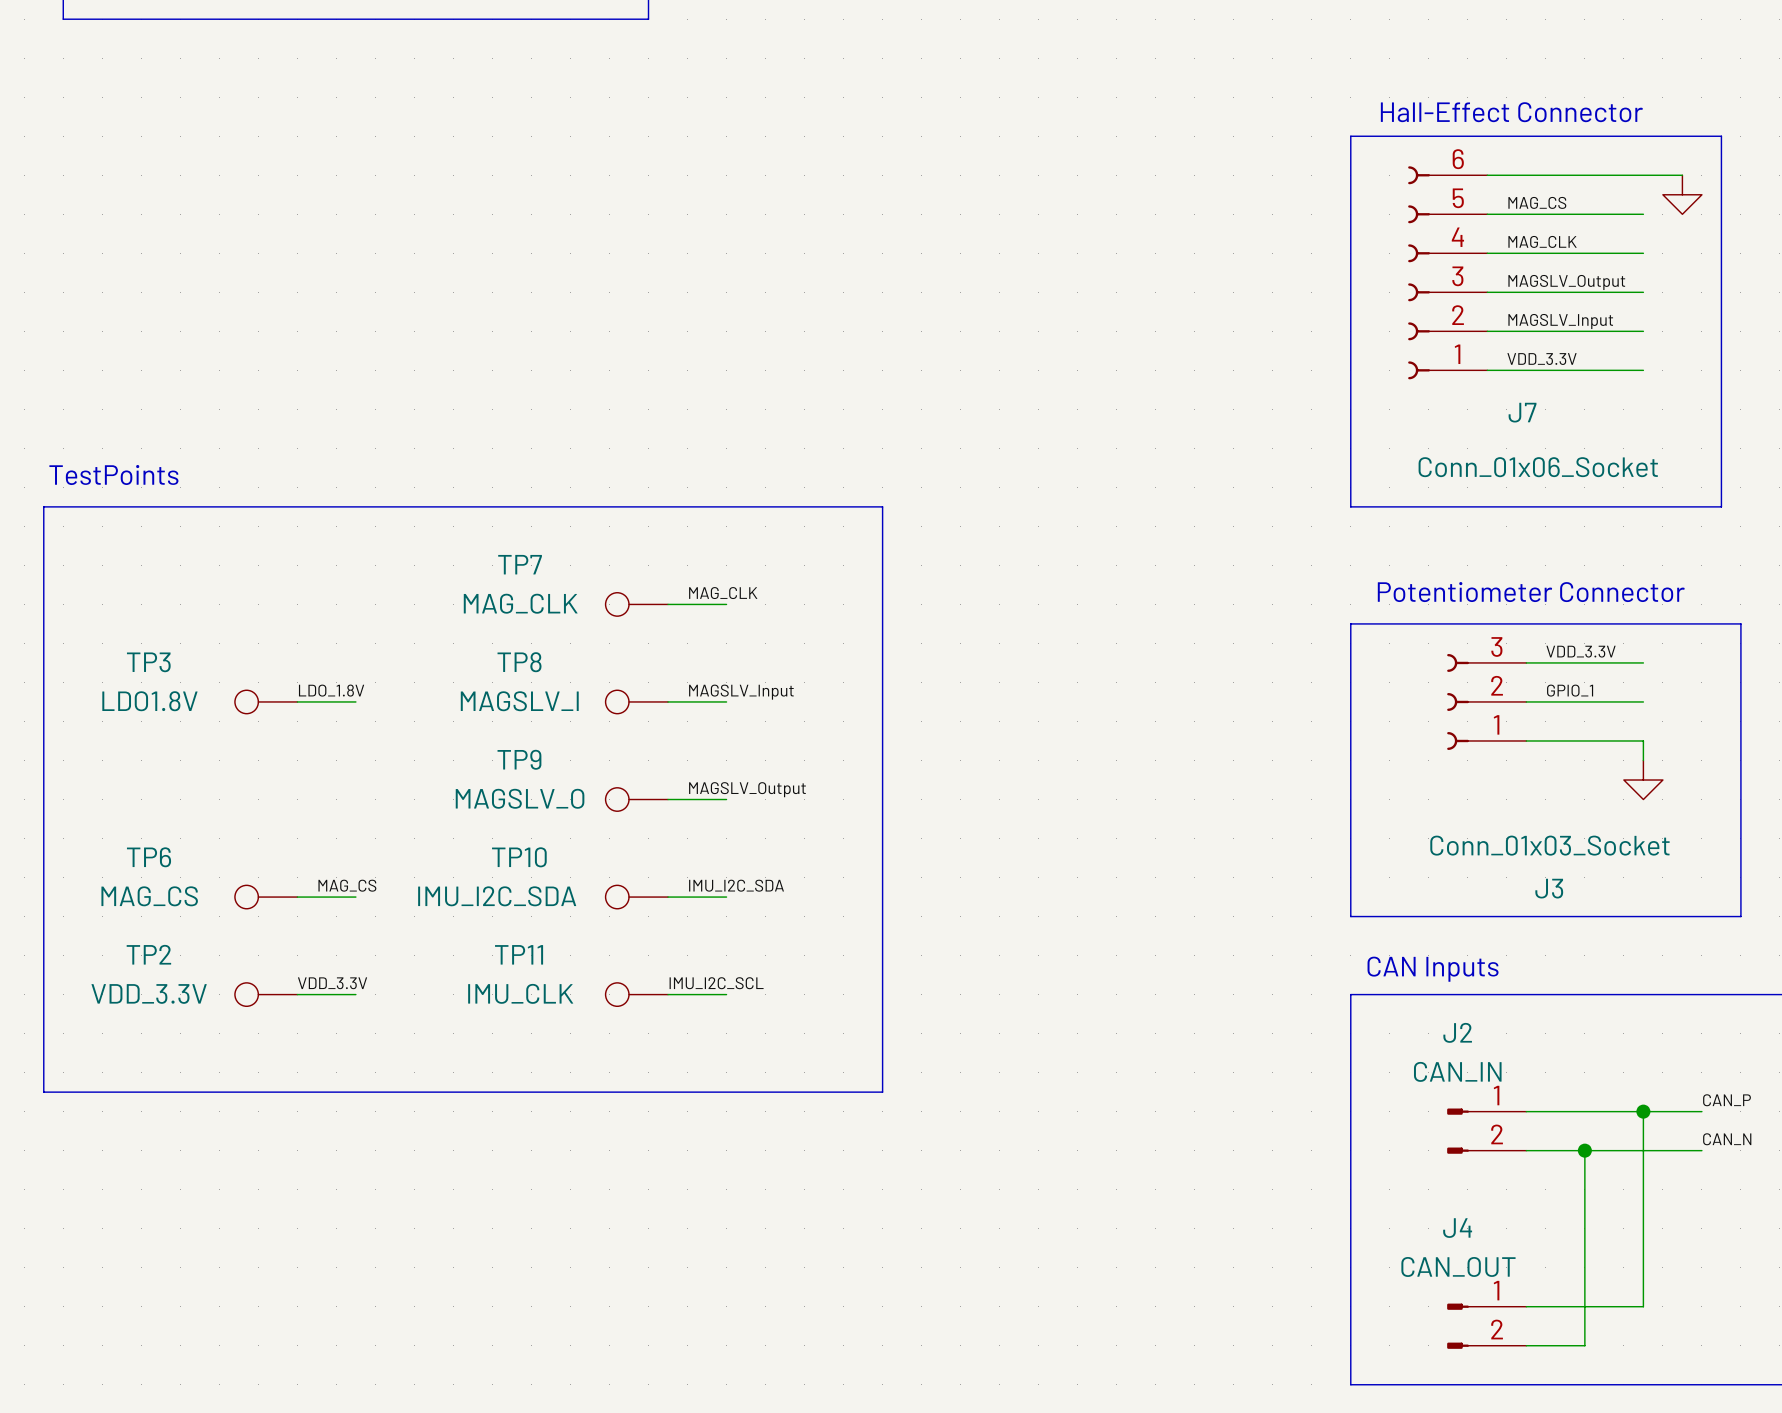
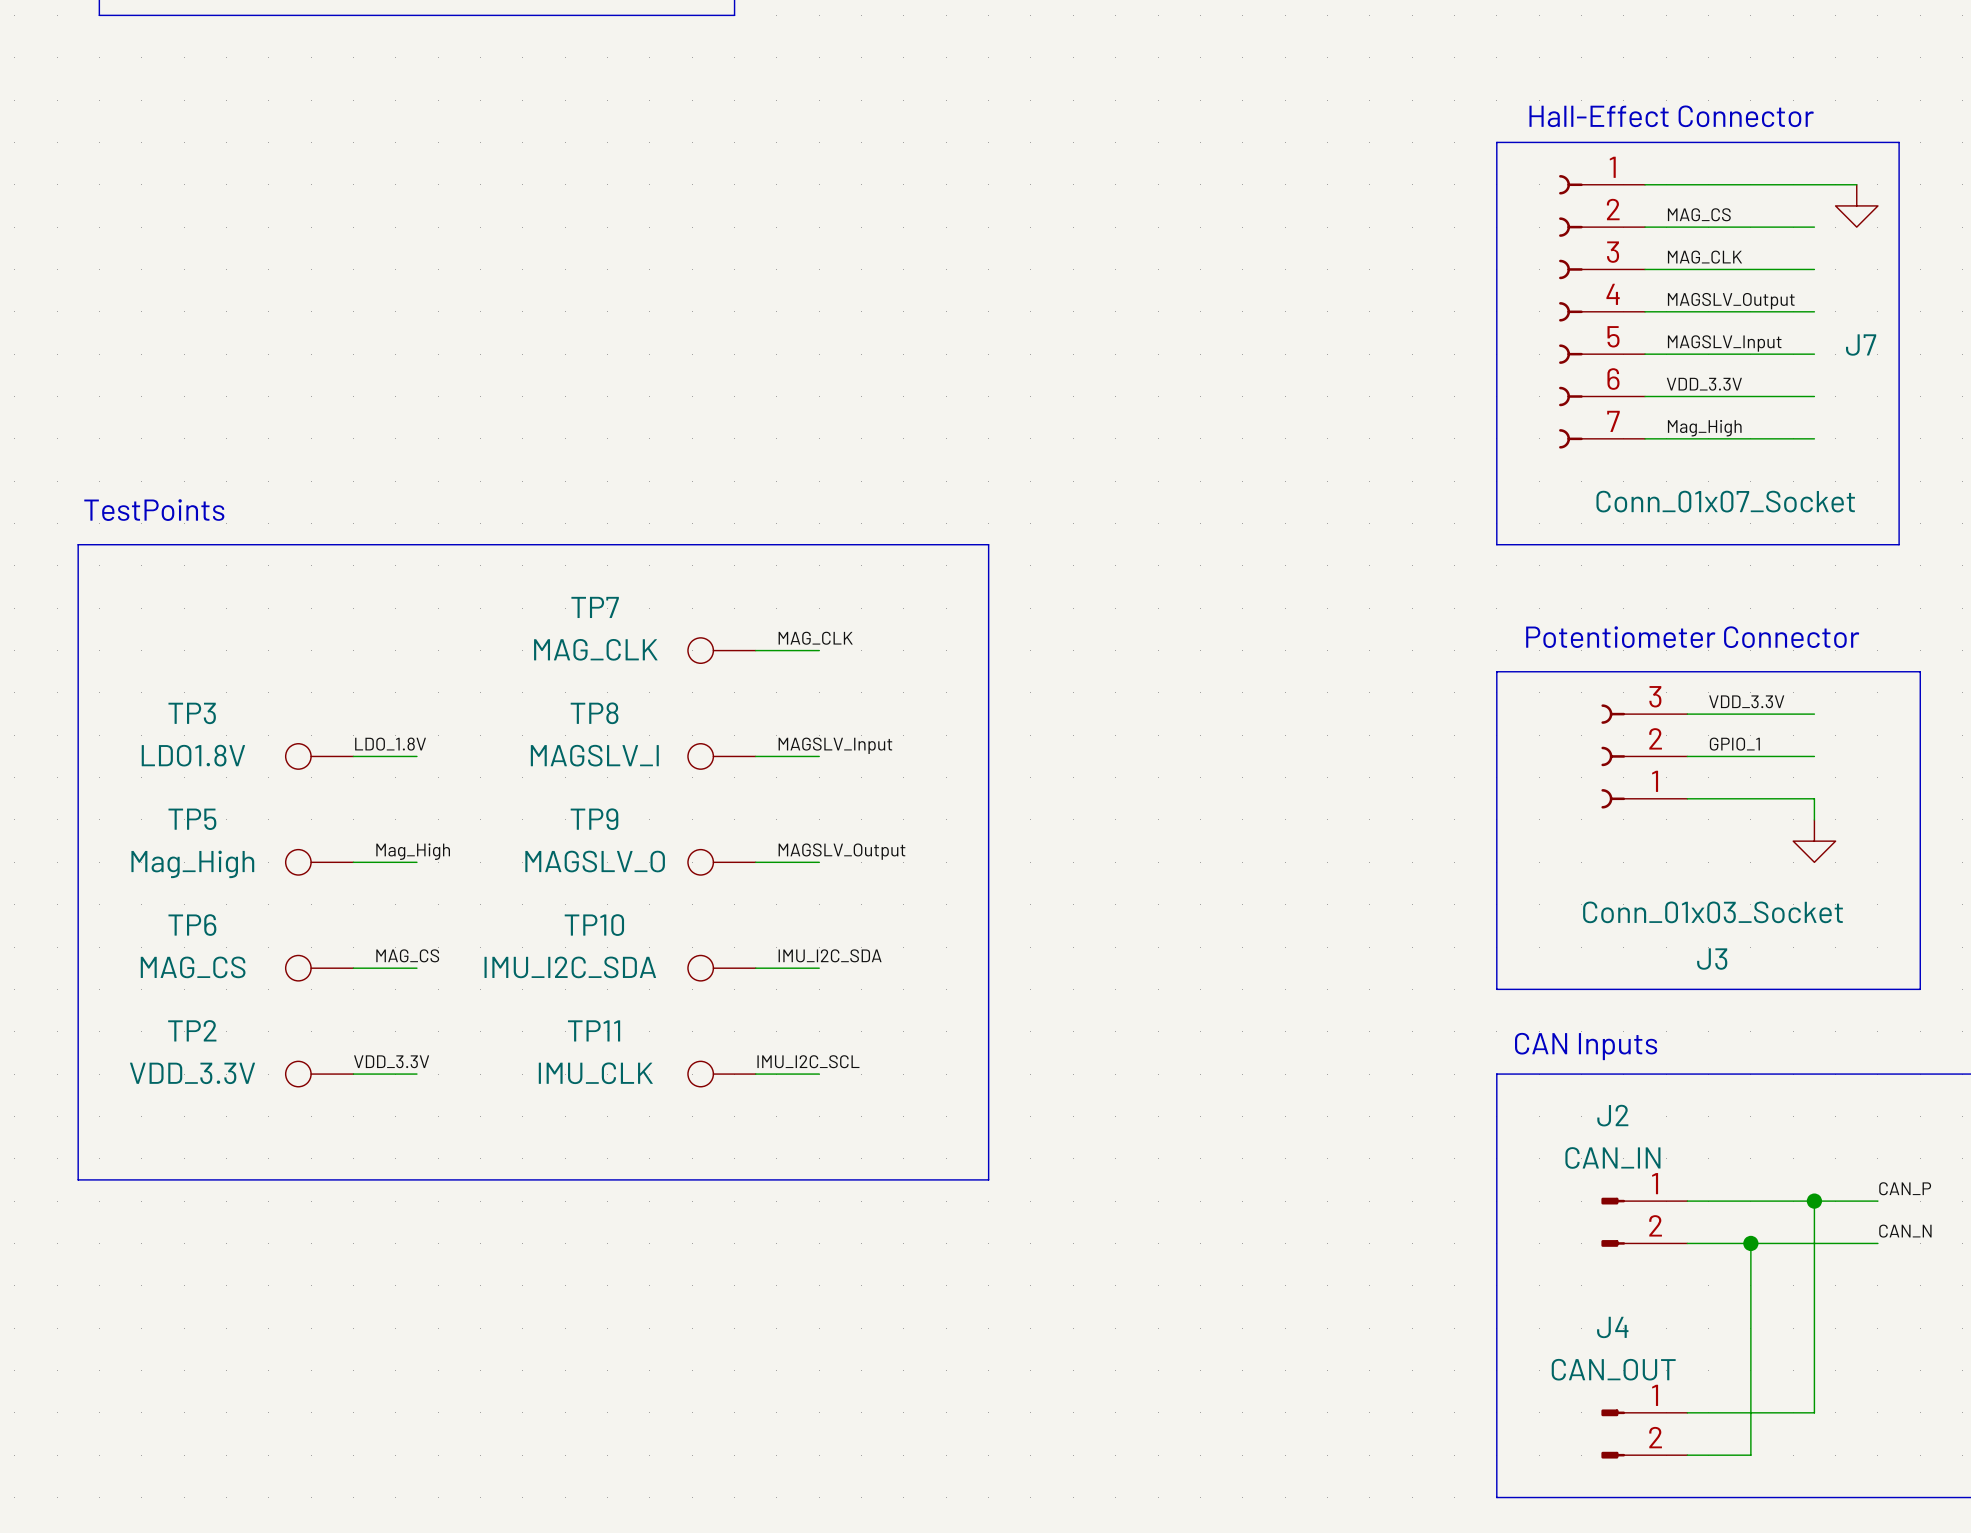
J7 symbol: [1408, 166, 1488, 380] -> [1559, 175, 1646, 449]
label: none -> Mag_High (1704, 428)
wire: none -> (1645, 438) (1814, 438)
J7 name position: J7 (1522, 412) -> J7 (1861, 345)
J7 value: Conn_01x06_Socket (1538, 467) -> Conn_01x07_Socket (1725, 501)
label: none -> Mag_High (413, 851)
TP5: none -> Mag_High (319, 862)
wire: none -> (353, 862) (416, 862)

